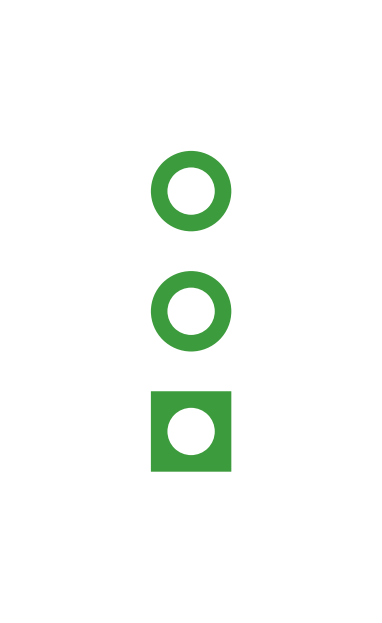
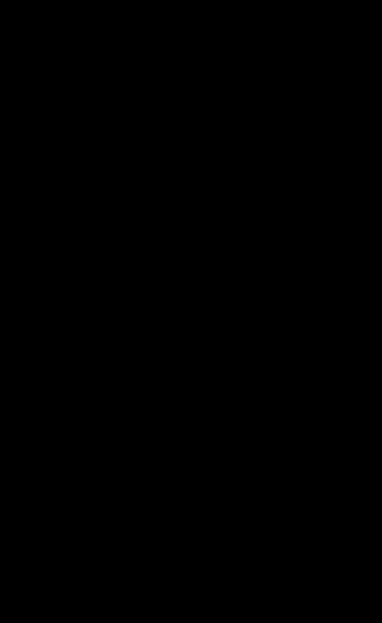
part: (191, 311) -> none

